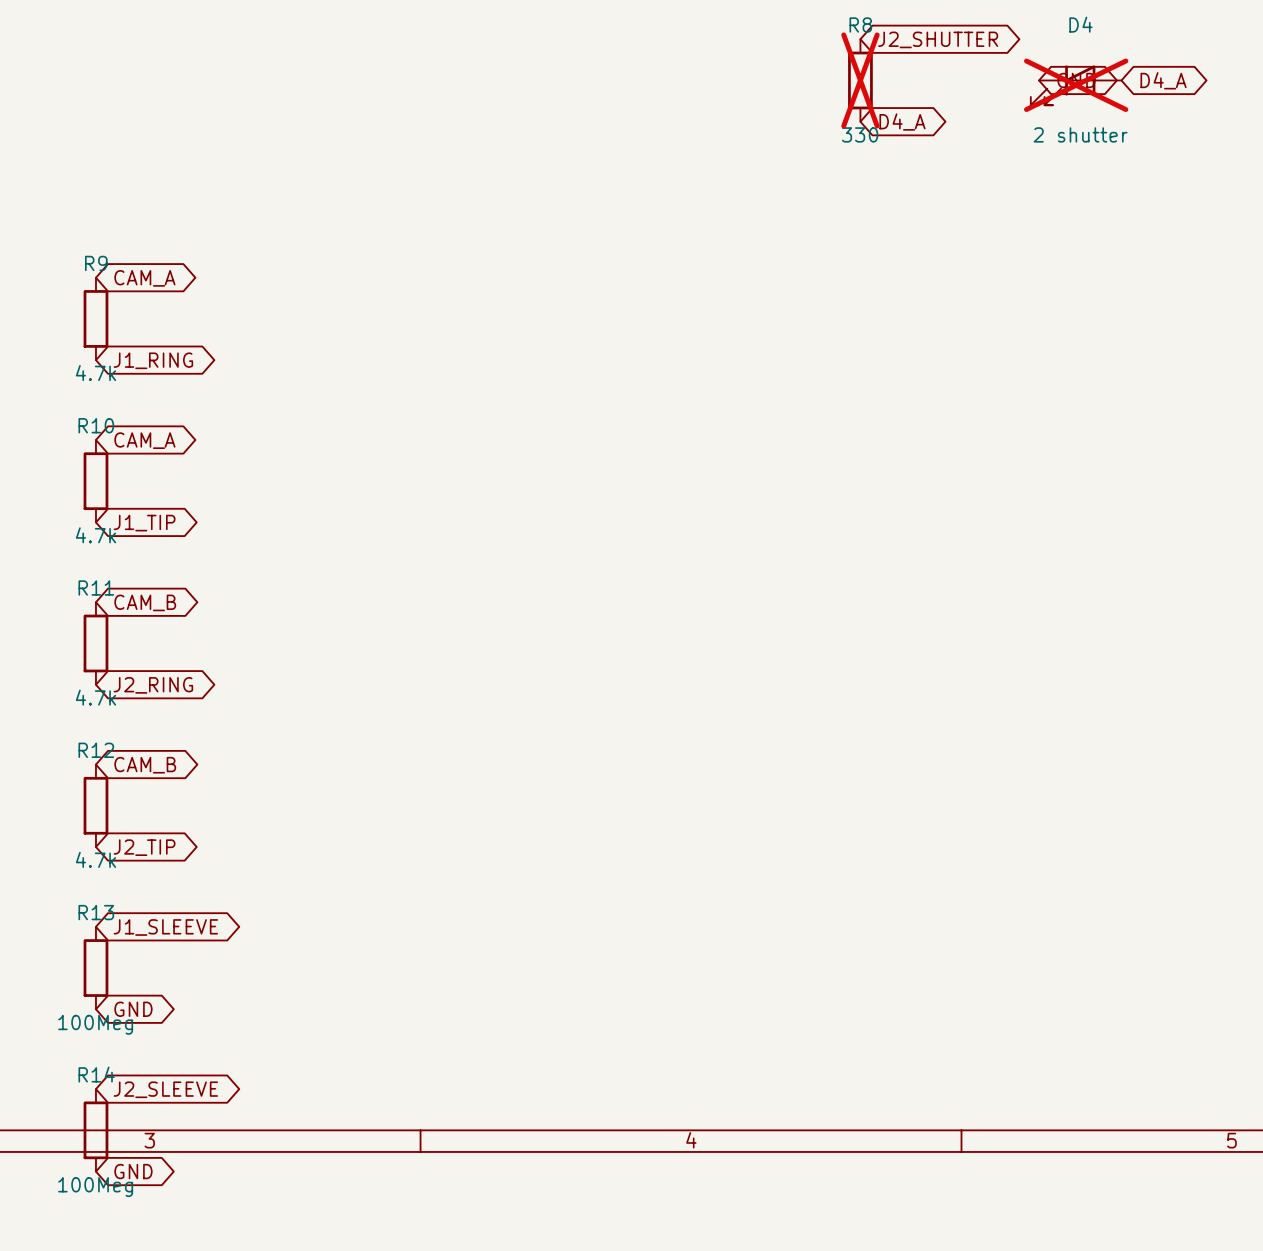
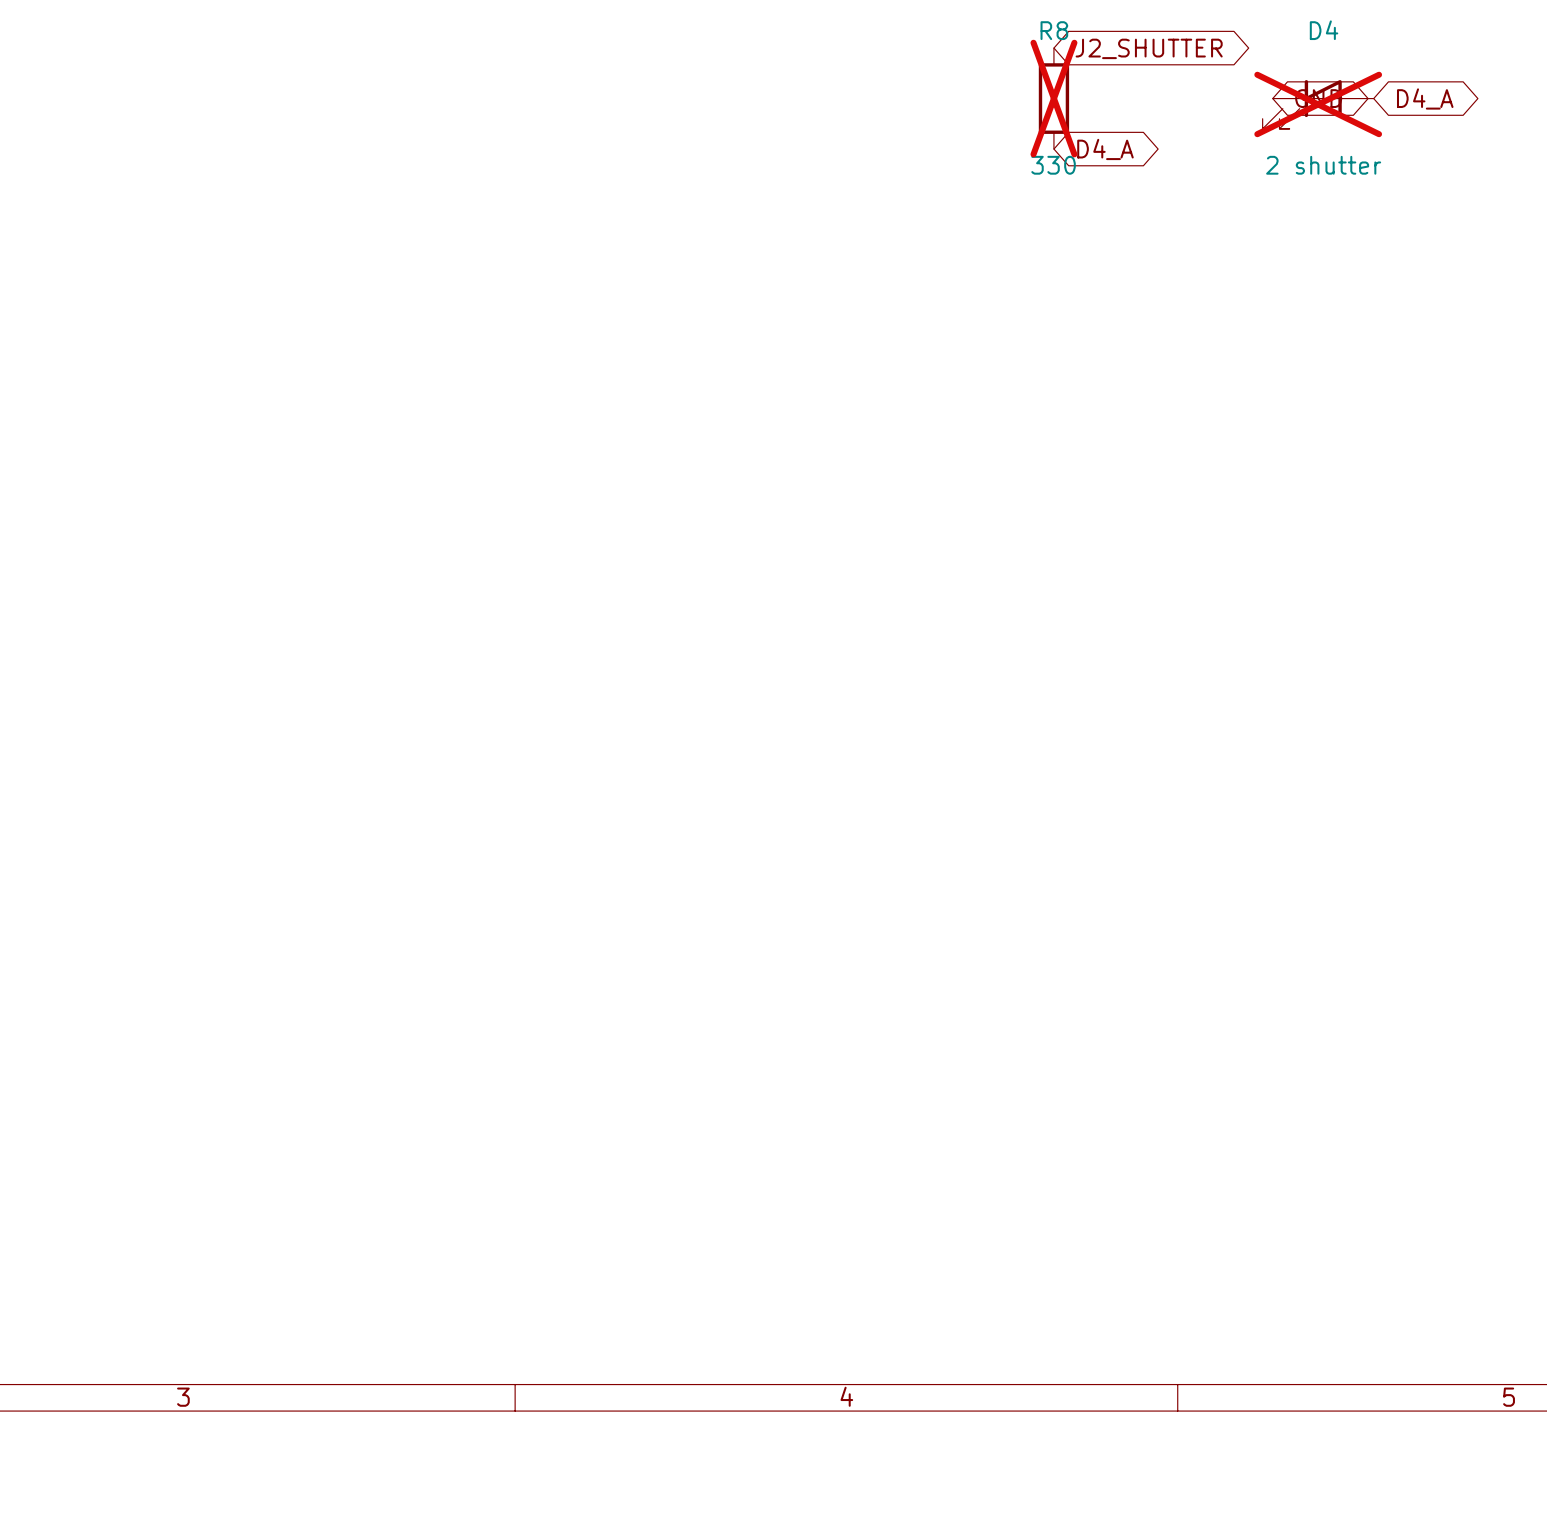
global label: CAM_A (144, 278) -> none
R9: 4.7k (95, 318) -> none
global label: J1_RING (153, 360) -> none
global label: CAM_A (144, 440) -> none
R10: 4.7k (95, 481) -> none
global label: J1_TIP (144, 523) -> none
global label: CAM_B (145, 602) -> none
R11: 4.7k (95, 643) -> none
global label: J2_RING (153, 685) -> none
global label: CAM_B (145, 765) -> none
R12: 4.7k (95, 805) -> none
global label: J2_TIP (144, 847) -> none
global label: J1_SLEEVE (165, 927) -> none
R13: 100Meg (95, 968) -> none
global label: GND (133, 1009) -> none
global label: J2_SLEEVE (165, 1089) -> none
R14: 100Meg (95, 1130) -> none
global label: GND (133, 1171) -> none

